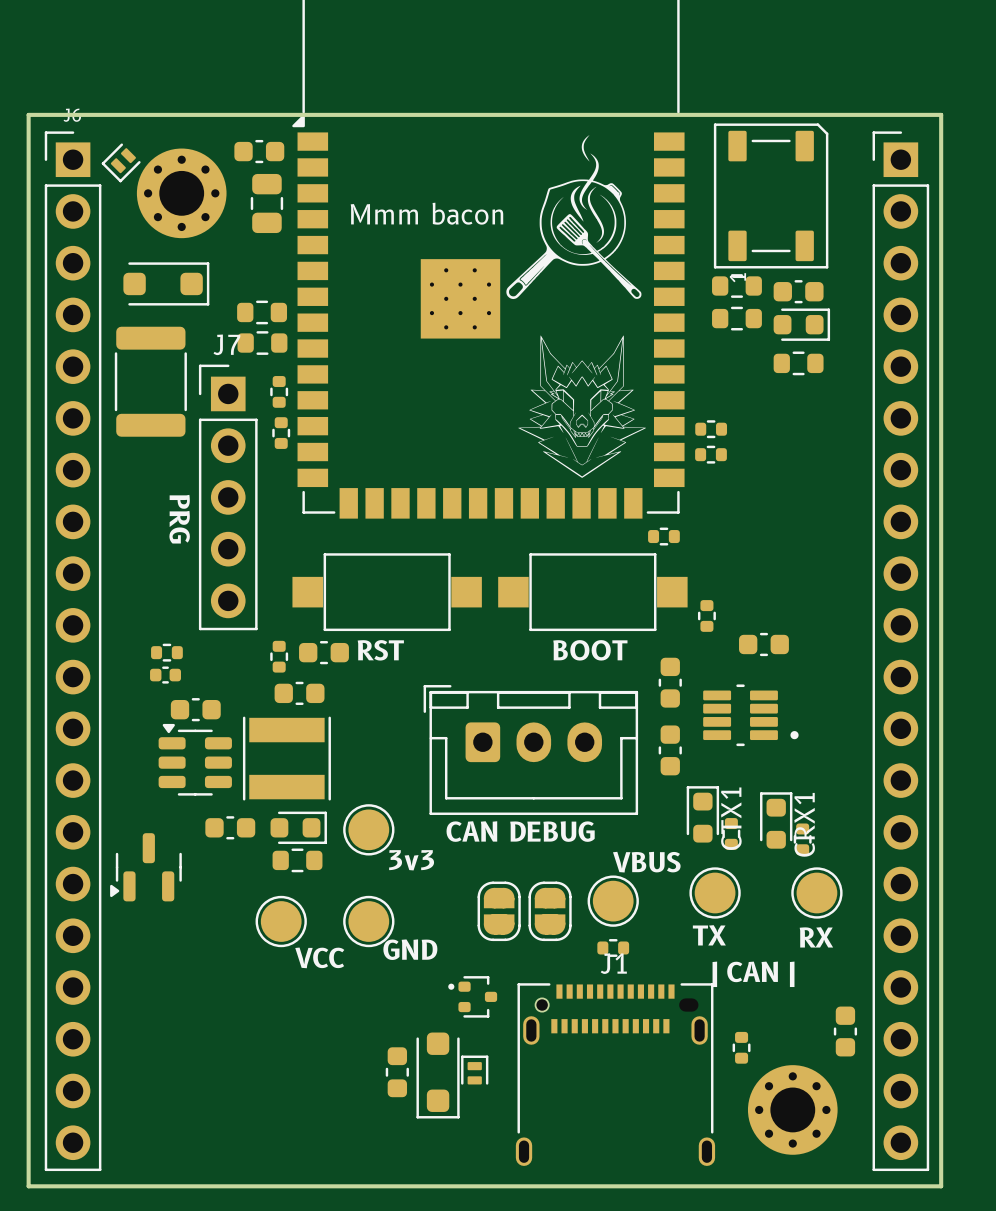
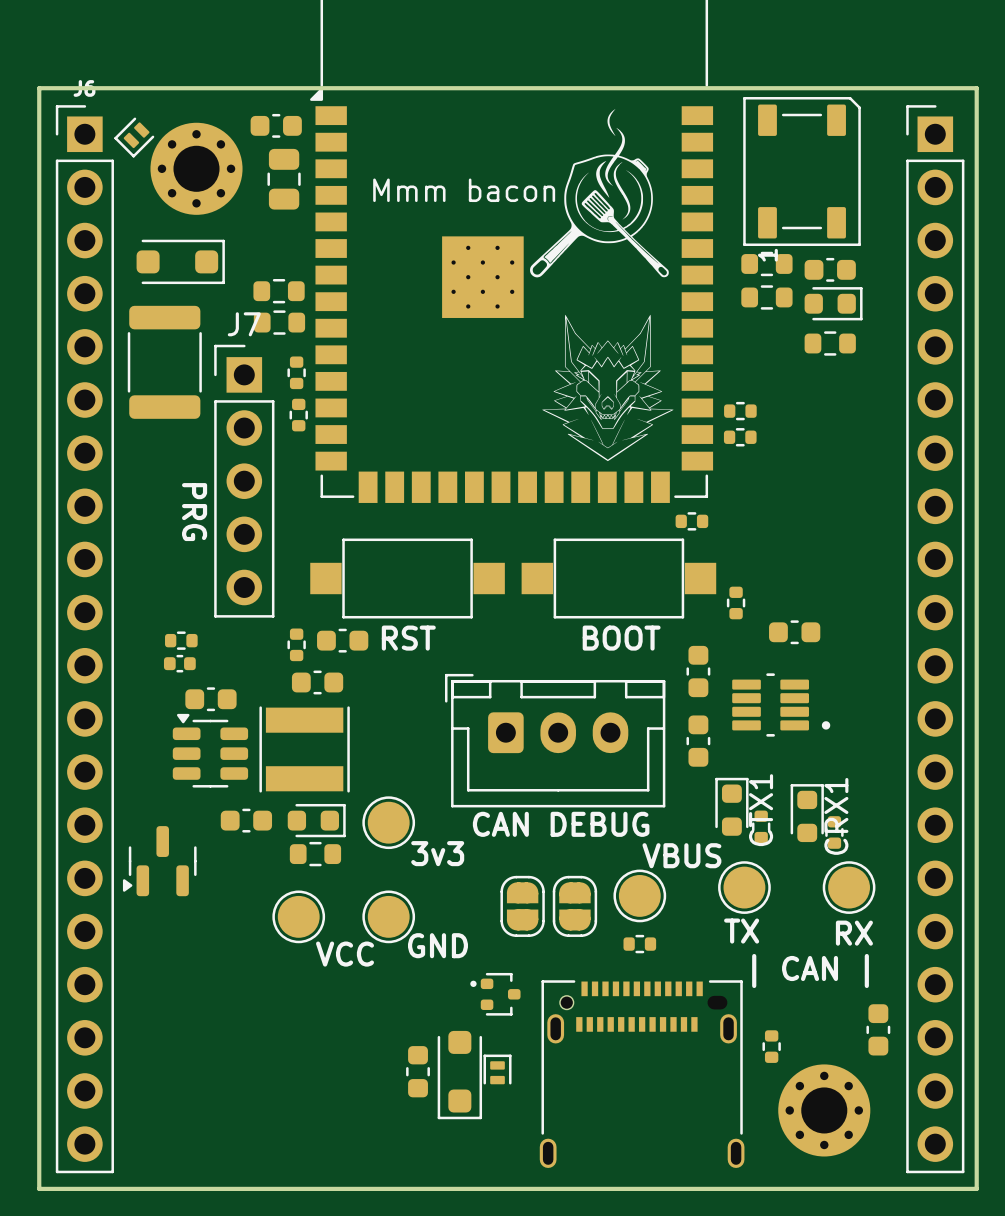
J1 name: J1 (613, 963) -> none

